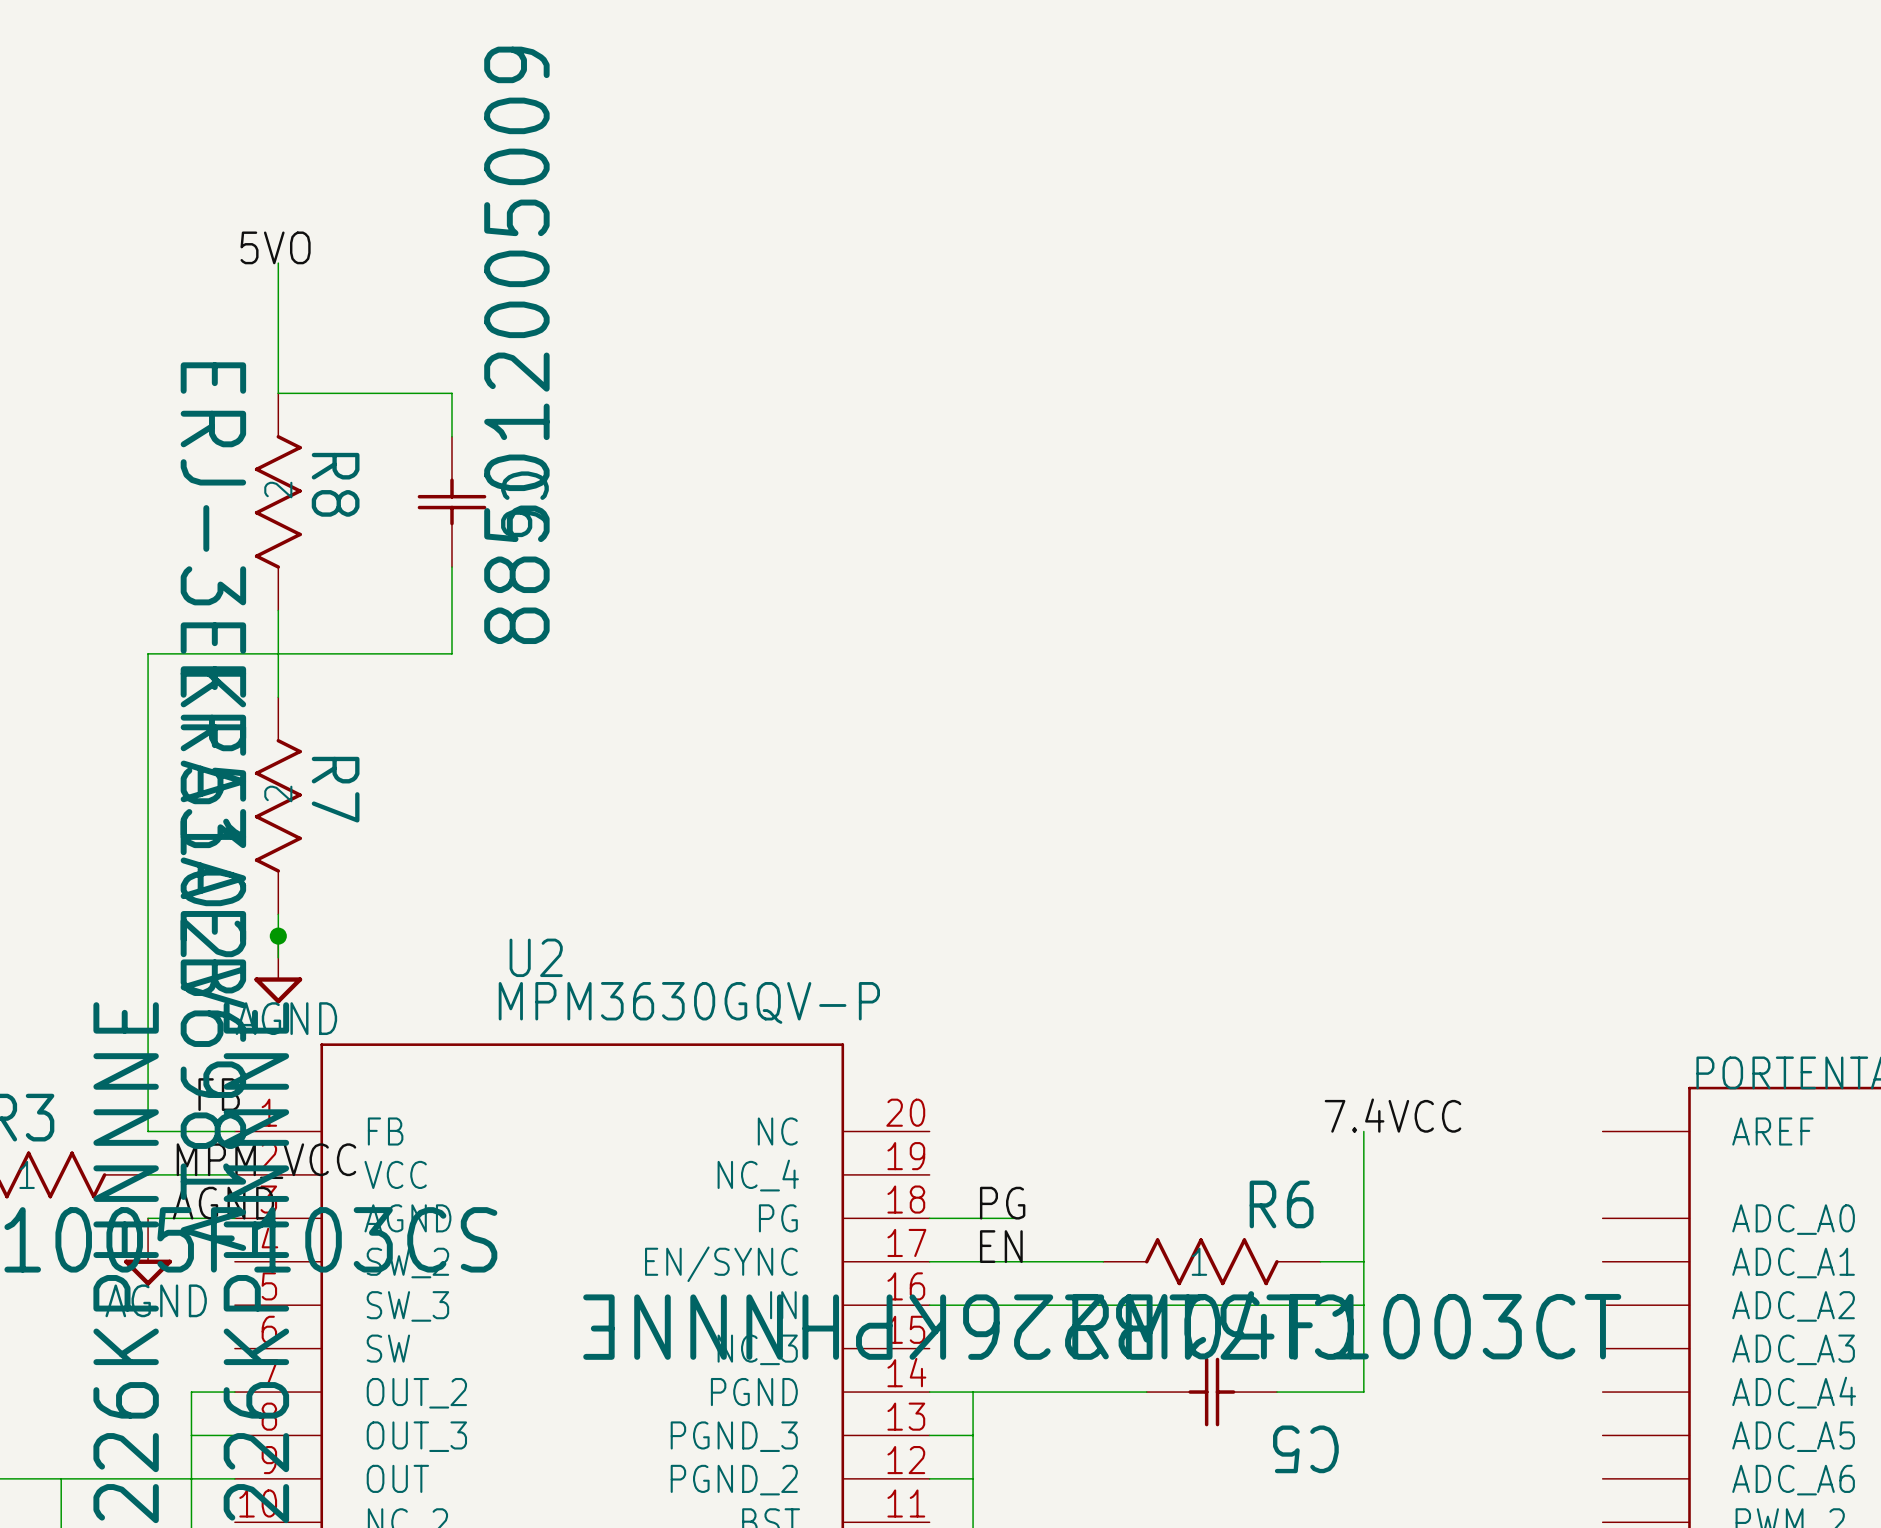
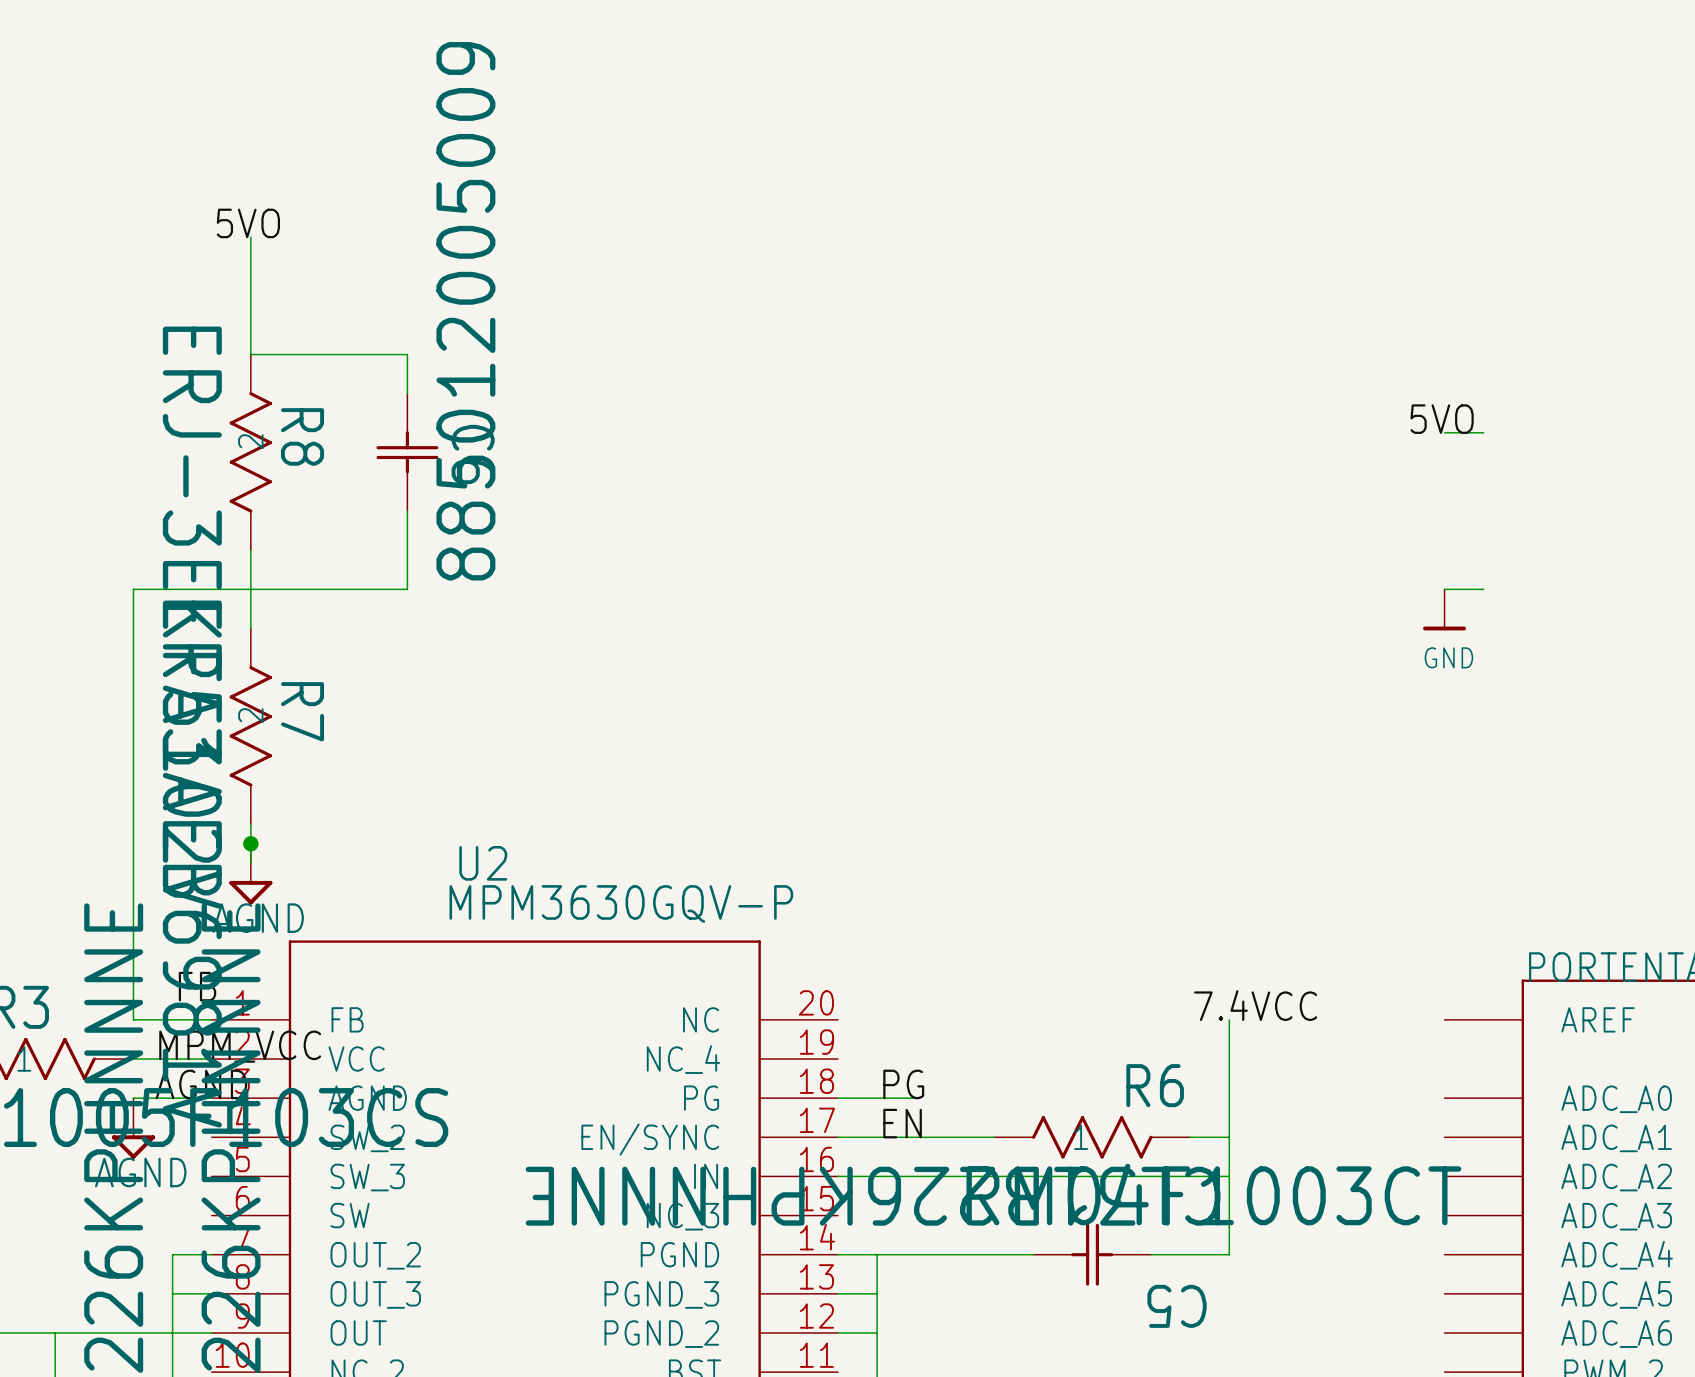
label: none -> 5VO (1442, 419)
wire: none -> (1444, 432) (1483, 432)
wire: none -> (1444, 589) (1483, 589)
power symbol: none -> GND (1444, 609)

